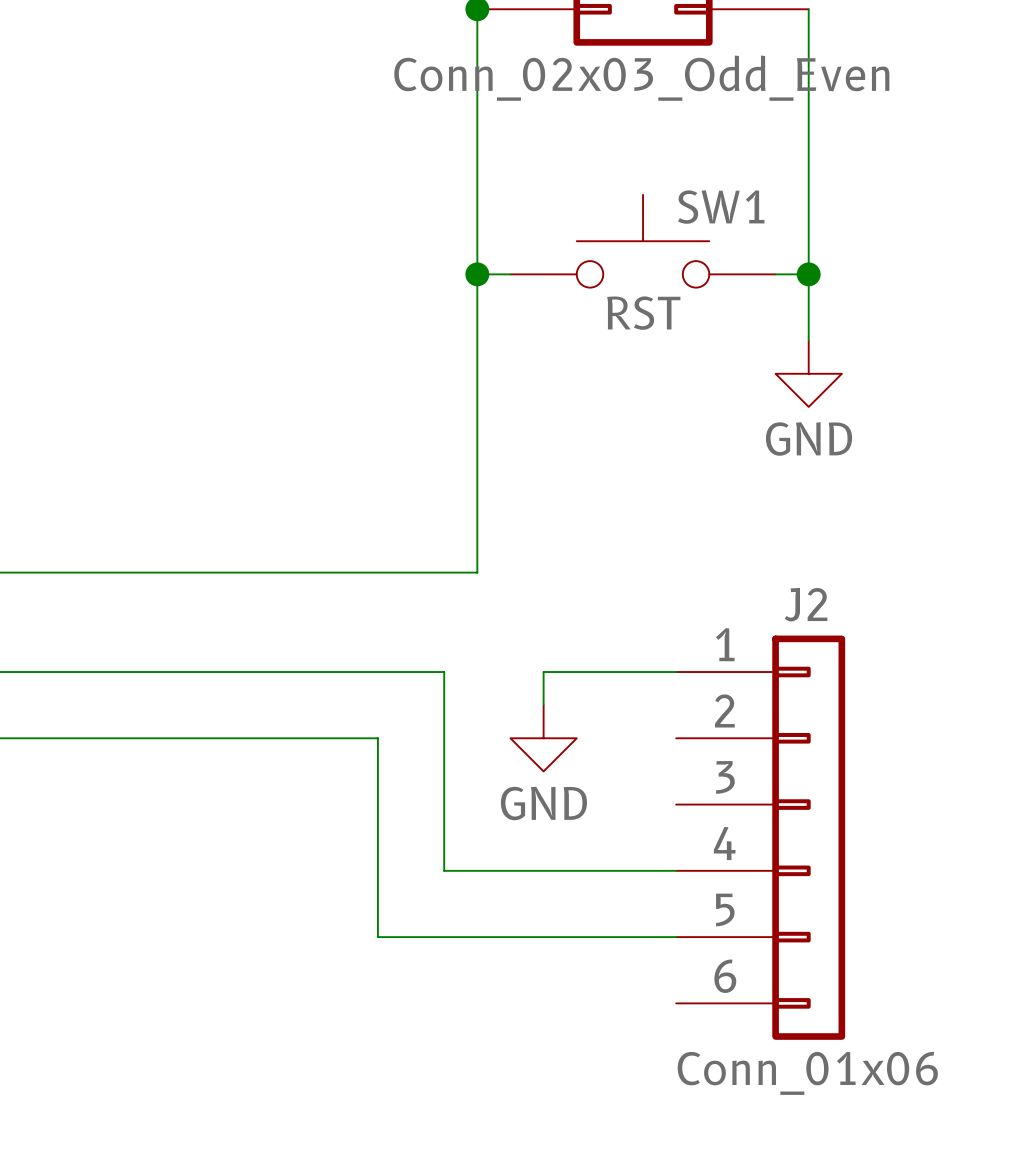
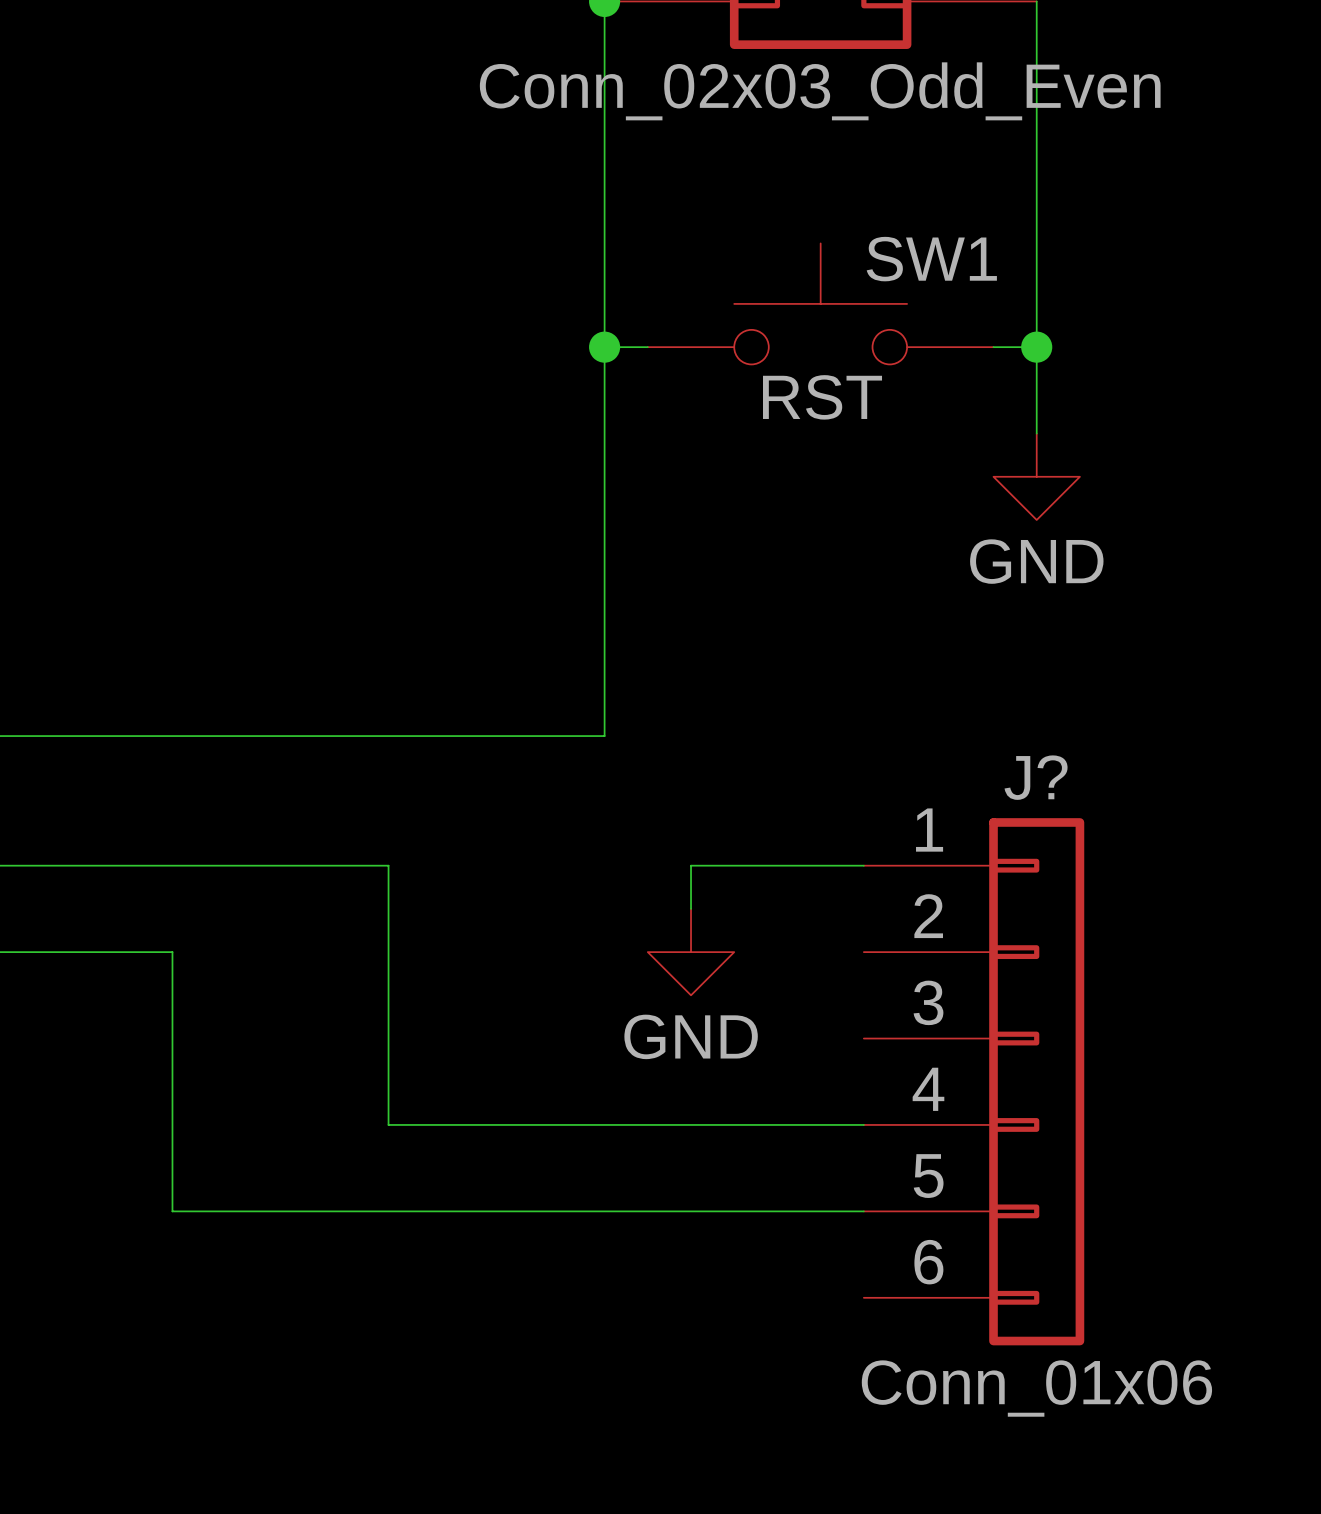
J2 name: J2 (806, 604) -> J? (1036, 777)
wire: (311, 672) (444, 672) (444, 870) -> (388, 865) (388, 1124) (561, 1124)
wire: (145, 738) (377, 738) (377, 937) -> (172, 952) (172, 1211) (474, 1211)

